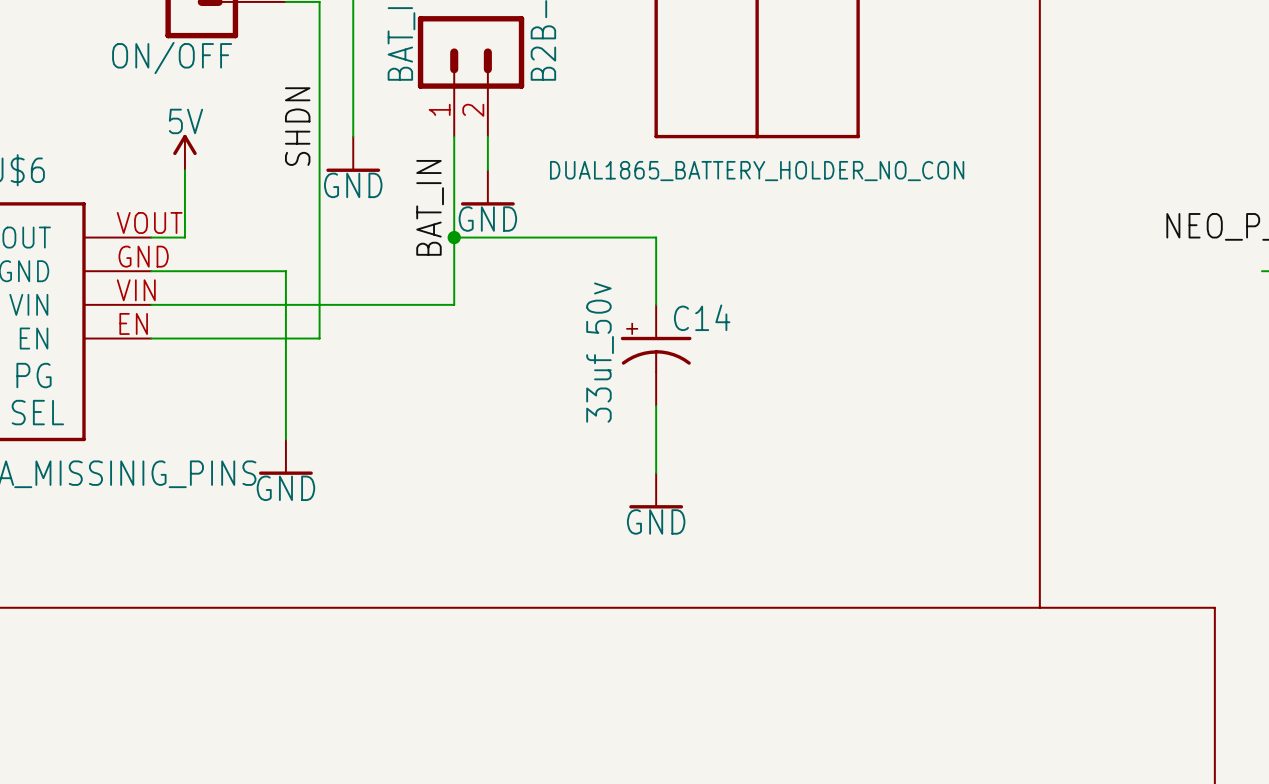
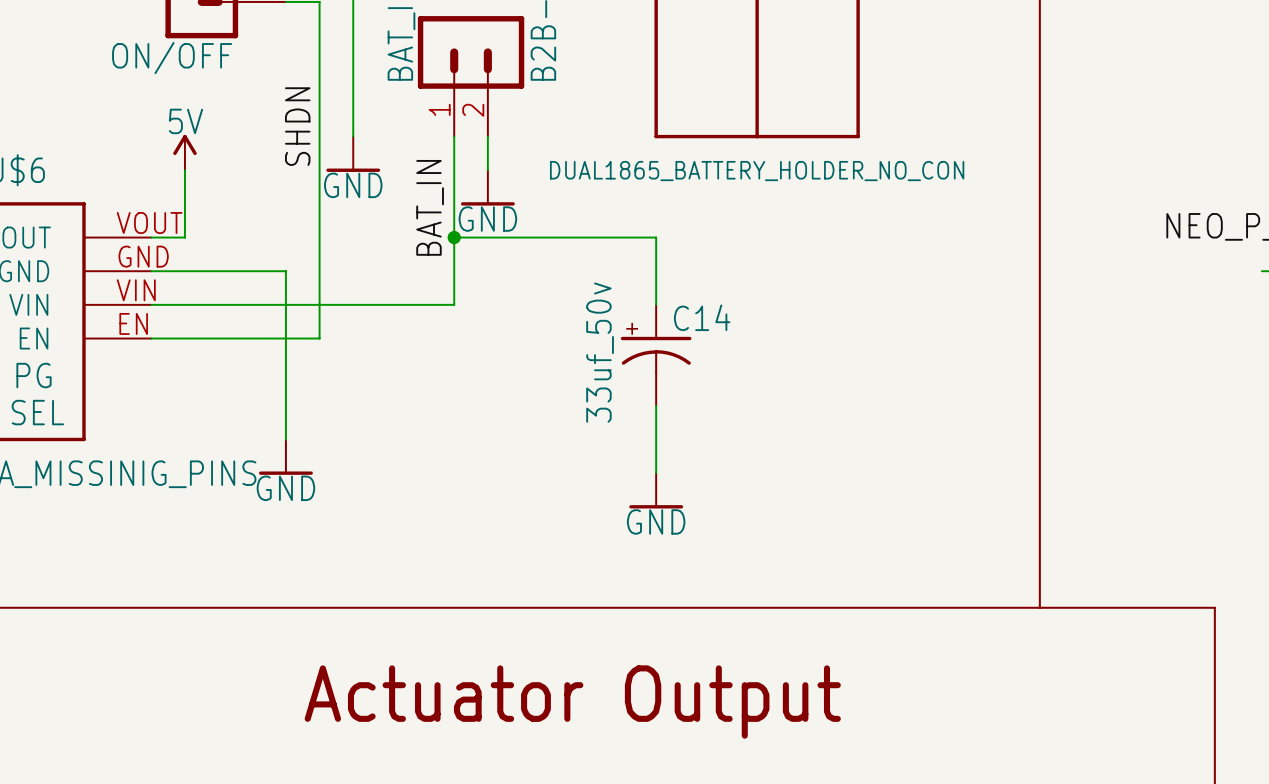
text: none -> Actuator Output (572, 702)

